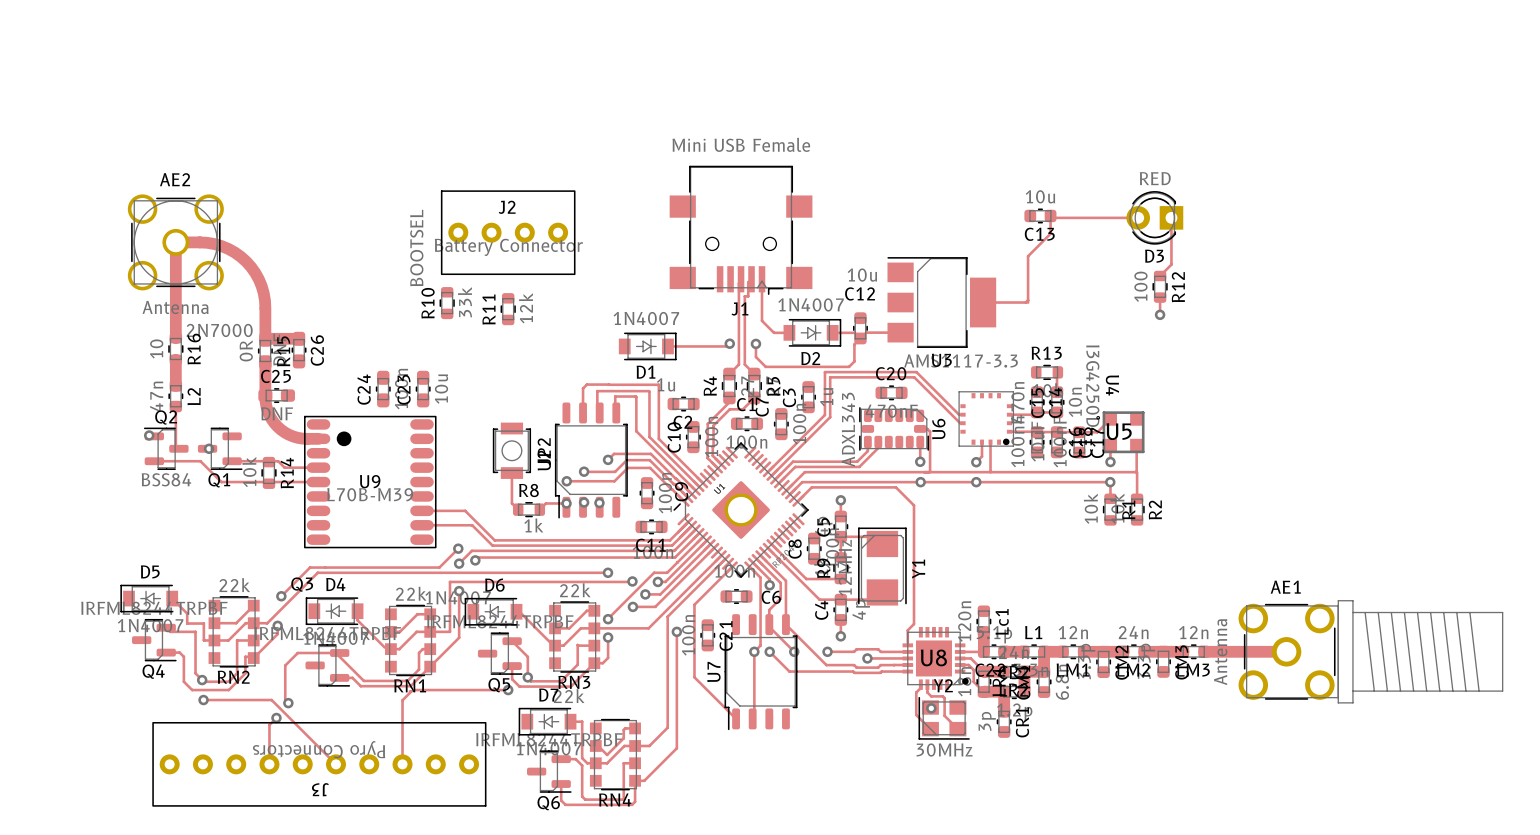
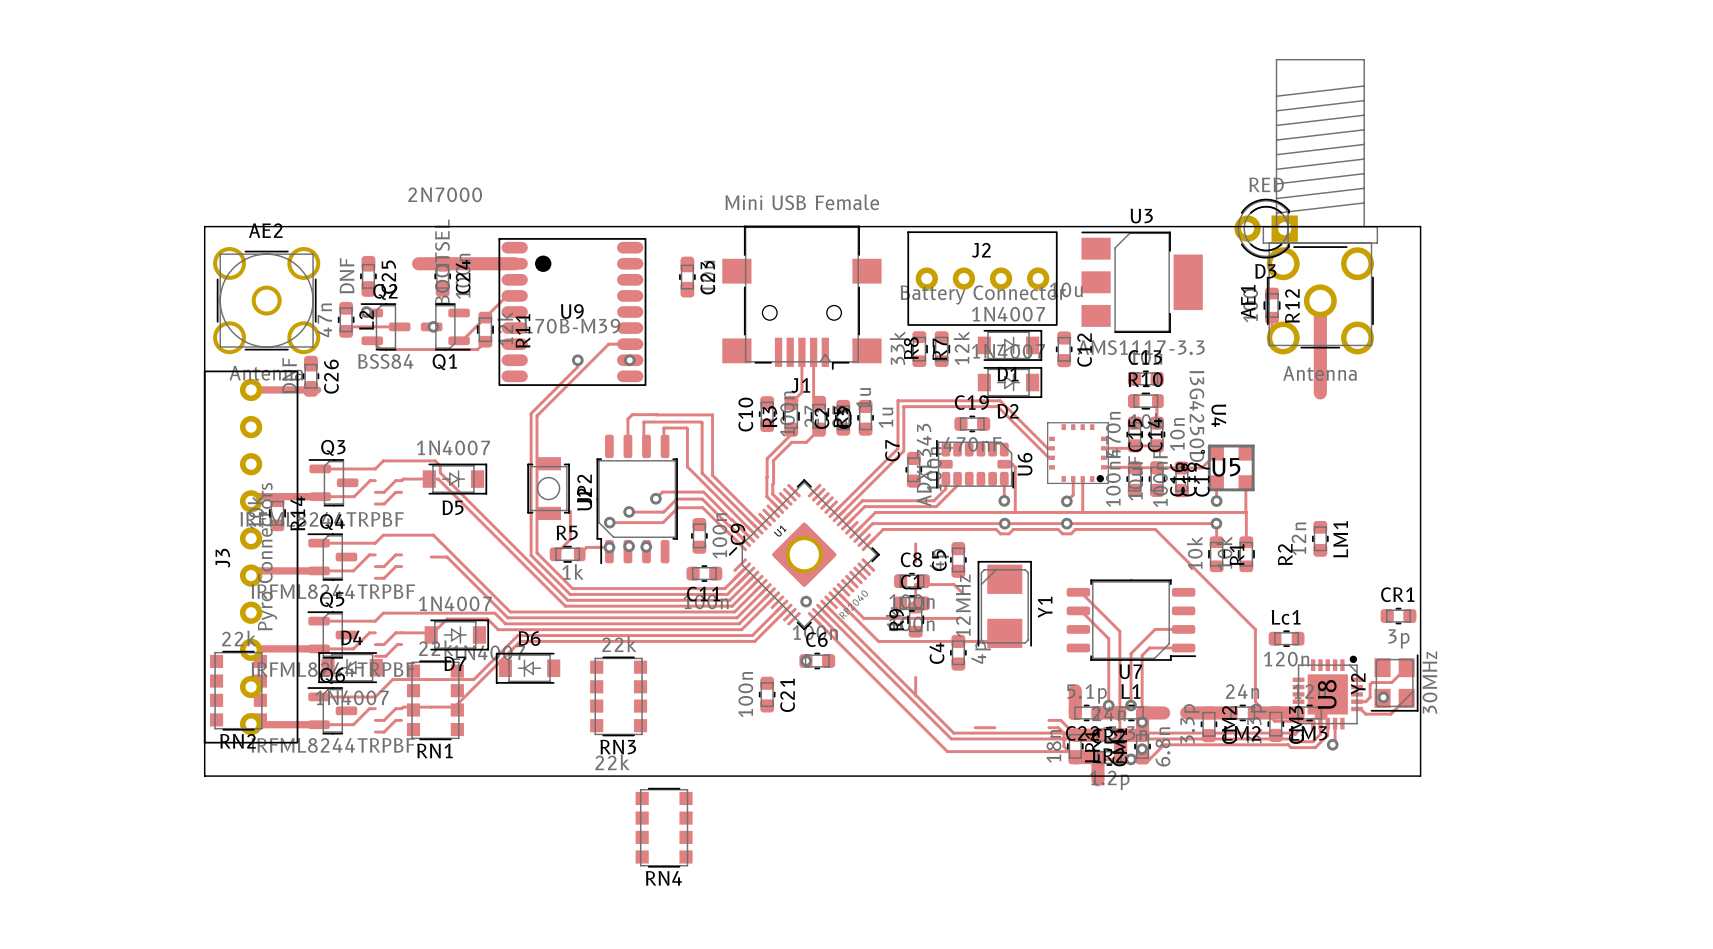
C13 position: (1040, 215) -> (1145, 378)
board edge: none -> (204, 226) (1420, 226) (1420, 776) (204, 776) (204, 226)
track: (1138, 217) (1052, 217) (1050, 215) (1050, 233) (1028, 256) (1028, 302) -> none
track: (1171, 217) (1171, 264) (1160, 275) -> none
J1 position: (741, 230) -> (801, 297)
J2 position: (508, 232) -> (982, 278)
C13 name position: C13 (1039, 234) -> C13 (1145, 357)
AE2 position: (175, 242) -> (266, 300)
track: none -> (418, 263) (514, 263)
track: none -> (514, 295) (507, 295) (462, 340) (459, 340)
track: (741, 279) (738, 283) (738, 338) -> none
track: (751, 279) (748, 282) (748, 296) (744, 296) (744, 364) (749, 369) -> (813, 363) (813, 397)
track: (762, 279) (762, 320) (773, 332) (789, 332) -> none
track: none -> (1320, 300) (1320, 392)
via: none -> (366, 312)
C12 name rotation: 0° (860, 293) -> 90° counterclockwise (1084, 350)
track: (1028, 300) (1025, 302) (983, 302) -> none
U3 position: (941, 302) -> (1142, 282)
R10: 33k (447, 303) -> none
track: none -> (399, 326) (350, 326) (346, 331)
via: none -> (433, 326)
track: (265, 307) (263, 293) (258, 279) (251, 267) (240, 256) (228, 248) (214, 244) (175, 242) (175, 338) -> none
track: (265, 309) (265, 339) (299, 338) -> none
R11 position: (508, 309) -> (485, 329)
via: (1160, 314) -> none
track: none -> (372, 340) (381, 349) (477, 349) (485, 341)
R7: none -> 33k (919, 349)
R8: none -> 12k (941, 349)
C12 position: (860, 328) -> (1064, 349)
D2 position: (812, 332) -> (1010, 382)
track: (832, 332) (854, 332) (860, 338) -> none
track: (900, 332) (866, 332) (854, 344) (854, 361) (849, 366) (765, 366) (755, 357) (755, 343) -> none
via: none -> (577, 360)
via: none -> (629, 360)
track: (729, 343) (727, 346) (667, 346) -> none
via: (729, 343) -> none
via: (755, 343) -> none
D1 position: (647, 346) -> (1010, 345)
R16: 10 (175, 349) -> none
R15: 0R (265, 351) -> none
R13 name: R13 (1046, 353) -> R10 (1145, 379)
track: (175, 359) (175, 385) -> none
U3 name position: U3 (941, 360) -> U3 (1141, 216)
U3 value position: AMS1117-3.3 (961, 361) -> AMS1117-3.3 (1141, 347)
track: none -> (251, 389) (317, 389)
track: (265, 362) (265, 401) (271, 419) (277, 426) (288, 434) (302, 438) (318, 438) -> none
C20 name: C20 (891, 373) -> C19 (971, 402)
R4 name: R4 (710, 386) -> R3 (769, 416)
C24 name position: C24 (364, 389) -> C24 (463, 276)
C24 position: (383, 389) -> (442, 276)
C23 name position: C23 (404, 389) -> C23 (707, 277)
C23 position: (423, 389) -> (687, 277)
C25 rotation: 0° (276, 395) -> 90° clockwise (368, 276)
C25 position: (276, 395) -> (368, 276)
L2 position: (175, 396) -> (346, 319)
C3 position: (808, 397) -> (865, 417)
C2 rotation: 0° (683, 404) -> 90° clockwise (843, 417)
C2 position: (683, 404) -> (843, 417)
track: (175, 406) (175, 448) (178, 448) -> none
C1 position: (747, 423) -> (911, 603)
C7 position: (781, 424) -> (913, 469)
via: (149, 435) -> none
C10 position: (693, 437) -> (767, 414)
track: none -> (375, 480) (370, 480) (354, 496) (255, 496) (251, 501)
Q2 position: (166, 448) -> (385, 326)
via: (209, 448) -> none
Q1 position: (220, 448) -> (445, 326)
track: none -> (401, 492) (395, 492) (384, 504) (375, 504)
track: (154, 461) (200, 461) (221, 482) (318, 482) -> none
track: (232, 461) (278, 461) (284, 467) (318, 467) -> none
track: (511, 473) (511, 503) (518, 509) -> (570, 511) (570, 539) (555, 554)
U9 position: (370, 482) -> (572, 312)
track: (895, 487) (914, 505) (914, 624) (907, 630) (907, 645) -> (977, 529) (996, 529) (1000, 533) (1009, 533) (1013, 529) (1058, 529) (1062, 533) (1071, 533) (1075, 529) (1155, 529) (1255, 629) (1255, 701) (1274, 721) (1310, 721) (1313, 723)
R8 name: R8 (528, 490) -> R5 (567, 532)
via: (840, 500) -> none
R2 name position: R2 (1155, 509) -> R2 (1285, 554)
track: none -> (375, 554) (369, 554) (353, 570) (255, 570) (251, 575)
track: none -> (401, 554) (395, 554) (384, 566) (375, 566)
track: (422, 510) (465, 510) (494, 540) (533, 540) -> (630, 344) (608, 344) (536, 415) (536, 552) (572, 588)
track: none -> (401, 566) (395, 566) (384, 578) (375, 578)
track: (422, 525) (472, 525) (492, 545) (531, 545) -> (577, 360) (577, 366) (531, 413) (531, 555) (570, 594)
C5 position: (840, 526) -> (958, 559)
track: none -> (1078, 592) (1080, 592) (1119, 631) (1119, 733)
track: (458, 548) (439, 567) (310, 567) (281, 596) -> none
via: (458, 548) -> none
C8 rotation: 0° (814, 548) -> 90° clockwise (911, 581)
C8 position: (814, 548) -> (911, 581)
track: (529, 550) (471, 550) (459, 563) -> (567, 600) (440, 472) (440, 465) (435, 460) (383, 460) (375, 468) (320, 468)
via: none -> (806, 601)
track: (676, 556) (478, 557) (475, 560) -> (732, 606) (565, 606) (438, 479) (403, 479) (395, 480) (384, 492) (375, 492)
via: (475, 560) -> none
track: none -> (1078, 610) (1080, 610) (1108, 638) (1108, 705)
track: (678, 561) (667, 572) (654, 572) (608, 619) -> (734, 611) (510, 611) (433, 535) (383, 535) (375, 543) (319, 543)
via: (459, 563) -> none
track: (680, 566) (665, 581) (657, 581) -> (737, 617) (507, 617) (447, 557) (431, 557)
Y1 position: (882, 566) -> (1004, 604)
track: (731, 567) (694, 604) (694, 677) (736, 718) -> none
track: (794, 567) (806, 579) (840, 579) -> (863, 618) (958, 618)
track: (682, 571) (660, 594) (645, 594) -> (739, 623) (505, 623) (494, 613) (383, 613) (375, 621) (319, 621)
track: (607, 572) (317, 572) (267, 623) (245, 623) (228, 640) (204, 640) (203, 623) (187, 623) (187, 613) (172, 598) -> none
via: (607, 572) -> none
track: none -> (1183, 629) (1155, 629) (1131, 653) (1131, 705)
track: (684, 577) (655, 606) (632, 606) -> (741, 629) (498, 629) (487, 618) (447, 618) (431, 635) (429, 632) (395, 632) (384, 644) (375, 644)
track: (760, 577) (760, 645) (754, 651) (754, 717) (752, 718) -> (826, 630) (947, 751) (1098, 751) (1106, 759) (1149, 759) (1164, 744) (1288, 744) (1290, 747) (1315, 747) (1327, 735) (1327, 723)
track: none -> (375, 632) (369, 632) (353, 648) (251, 649)
track: (785, 580) (785, 624) (826, 665) (854, 665) (856, 667) (894, 665) -> (854, 633) (953, 733) (1100, 733) (1104, 728) (1112, 728) (1117, 733) (1293, 733) (1294, 734) (1298, 731)
track: (632, 581) (449, 581) (449, 631) (416, 631) (399, 649) (390, 649) -> none
via: (632, 581) -> none
via: (657, 581) -> none
track: (694, 582) (648, 628) (580, 628) (563, 645) (555, 645) -> (752, 635) (517, 635) (473, 679) (392, 679) (375, 697) (319, 697)
track: (780, 583) (780, 598) (769, 609) (769, 626) (794, 651) -> (848, 636) (951, 738) (1291, 738) (1293, 741) (1312, 741) (1320, 734) (1320, 723)
Q3 name position: Q3 (302, 584) -> Q3 (333, 447)
via: (769, 585) -> none
track: (696, 587) (667, 616) (667, 727) (649, 745) (624, 745) (607, 763) (587, 763) (582, 758) (582, 721) (570, 721) -> (754, 641) (520, 641) (454, 707) (403, 707) (395, 708) (384, 720) (375, 720)
track: (807, 587) (819, 599) (875, 599) (882, 592) -> (878, 641) (996, 641)
track: none -> (401, 644) (397, 644) (385, 656) (375, 656)
track: (459, 591) (459, 637) (410, 686) (360, 686) (352, 677) (339, 677) -> none
via: (459, 591) -> none
track: none -> (1183, 647) (1149, 647) (1142, 655) (1142, 722)
via: (645, 594) -> none
via: (281, 596) -> none
C6 position: (736, 596) -> (817, 660)
C6 name position: C6 (771, 597) -> C6 (816, 639)
D5 rotation: 0° (149, 598) -> 180° (454, 479)
D5 position: (149, 598) -> (454, 479)
track: (253, 605) (236, 623) (214, 623) -> none
via: none -> (806, 660)
via: (632, 606) -> none
C4 position: (840, 609) -> (958, 652)
track: (594, 610) (586, 610) (569, 628) (555, 628) -> none
track: (357, 611) (357, 620) (384, 647) -> none
track: (516, 611) (519, 611) (552, 644) -> none
track: none -> (1406, 667) (1391, 682) (1372, 682) (1370, 684) (1370, 697) (1365, 701) (1357, 701)
track: (430, 614) (417, 614) (399, 631) (390, 631) -> none
via: (608, 619) -> none
Lc1 value position: 120n (964, 621) -> 120n (1286, 659)
Lc1 rotation: 0° (983, 621) -> 90° clockwise (1286, 638)
Lc1 position: (983, 621) -> (1286, 638)
Lc1 name position: Lc1 (1002, 621) -> Lc1 (1286, 617)
track: (277, 625) (277, 634) (253, 658) (245, 656) (245, 673) (228, 690) (192, 690) (183, 681) (183, 656) (179, 652) (166, 652) -> none
via: (277, 625) -> none
track: (166, 627) (170, 631) (195, 631) (195, 673) (203, 681) (228, 681) (237, 673) (237, 640) (253, 640) -> none
track: (676, 631) (676, 748) (644, 780) (635, 780) (635, 801) (632, 804) (565, 804) (561, 800) (561, 784) -> none
via: (676, 631) -> none
LM1 value position: 12n (1073, 632) -> 12n (1298, 538)
via: (840, 636) -> none
track: (608, 637) (608, 657) (602, 663) (594, 663) (570, 686) (519, 686) (512, 679) (512, 666) -> none
via: (608, 637) -> none
via: none -> (1383, 697)
track: none -> (1406, 698) (1390, 714) (1365, 714) (1360, 709) (1357, 709)
Q4 rotation: 0° (154, 640) -> 180° (332, 557)
Q4 position: (154, 640) -> (332, 557)
track: (512, 641) (527, 656) (527, 678) (530, 681) (561, 681) (577, 664) (577, 644) (594, 645) -> none
via: none -> (1108, 705)
via: none -> (1131, 705)
track: none -> (375, 708) (369, 708) (353, 724) (251, 724)
track: (432, 649) (422, 649) (419, 652) (419, 669) (407, 680) (363, 680) (339, 656) (339, 652) (297, 652) (285, 665) (285, 700) (288, 703) -> none
via: (754, 651) -> none
track: (769, 651) (789, 671) (907, 671) -> none
via: (769, 651) -> none
via: (794, 651) -> none
track: (827, 651) (878, 649) (880, 651) (911, 651) -> none
via: (827, 651) -> none
track: (960, 651) (983, 651) -> none
LM1 rotation: 0° (1073, 651) -> 90° clockwise (1320, 538)
LM1 position: (1073, 651) -> (1320, 538)
track: (1204, 651) (1286, 651) -> none
AE1 rotation: 0° (1370, 651) -> 90° counterclockwise (1320, 206)
AE1 position: (1370, 651) -> (1320, 206)
Q5 rotation: 0° (500, 653) -> 180° (332, 635)
Q5 position: (500, 653) -> (332, 635)
track: none -> (401, 720) (395, 720) (384, 732) (375, 732)
track: (867, 658) (907, 658) -> none
via: (867, 658) -> none
U8 rotation: 0° (935, 658) -> 90° counterclockwise (1327, 692)
U8 position: (935, 658) -> (1327, 692)
via: none -> (1142, 722)
track: none -> (1335, 723) (1335, 742) (1332, 744)
Q3 rotation: 0° (327, 665) -> 180° (333, 482)
Q3 position: (327, 665) -> (333, 482)
LM1 name position: LM1 (1072, 670) -> LM1 (1340, 539)
U7 rotation: 0° (761, 672) -> 90° counterclockwise (1131, 620)
U7 position: (761, 672) -> (1131, 620)
via: (527, 677) -> none
via: (202, 680) -> none
via: none -> (1332, 744)
track: (920, 684) (920, 687) (916, 692) (916, 715) (930, 729) -> none
track: (927, 684) (927, 692) (931, 696) (942, 696) (944, 698) (944, 715) (957, 729) -> none
via: none -> (1142, 749)
track: (414, 690) (508, 690) -> none
via: (508, 690) -> none
track: (409, 691) (402, 700) (402, 764) -> none
via: none -> (1131, 759)
via: (203, 700) -> none
track: (203, 701) (271, 700) (336, 764) -> none
via: (288, 703) -> none
via: (931, 708) -> none
track: (276, 717) (269, 724) (269, 764) -> none
via: (276, 717) -> none
Y2 rotation: 0° (944, 718) -> 90° counterclockwise (1394, 683)
Y2 position: (944, 718) -> (1394, 683)
D7 rotation: 0° (547, 721) -> 180° (456, 635)
D7 position: (547, 721) -> (456, 635)
CR1 value position: 3p (987, 721) -> 3p (1398, 638)
CR1 rotation: 0° (1004, 721) -> 90° clockwise (1398, 616)
CR1 position: (1004, 721) -> (1398, 616)
CR1 name position: CR1 (1022, 722) -> CR1 (1397, 594)
track: (635, 728) (625, 728) (623, 738) (607, 754) (595, 745) -> none
track: (560, 759) (575, 759) (582, 765) (582, 796) (585, 799) (623, 799) (623, 763) (635, 763) -> none
J3 rotation: 0° (319, 764) -> 90° clockwise (251, 557)
J3 position: (319, 764) -> (251, 557)
Q6 rotation: 0° (549, 771) -> 180° (332, 710)
Q6 position: (549, 771) -> (332, 710)

